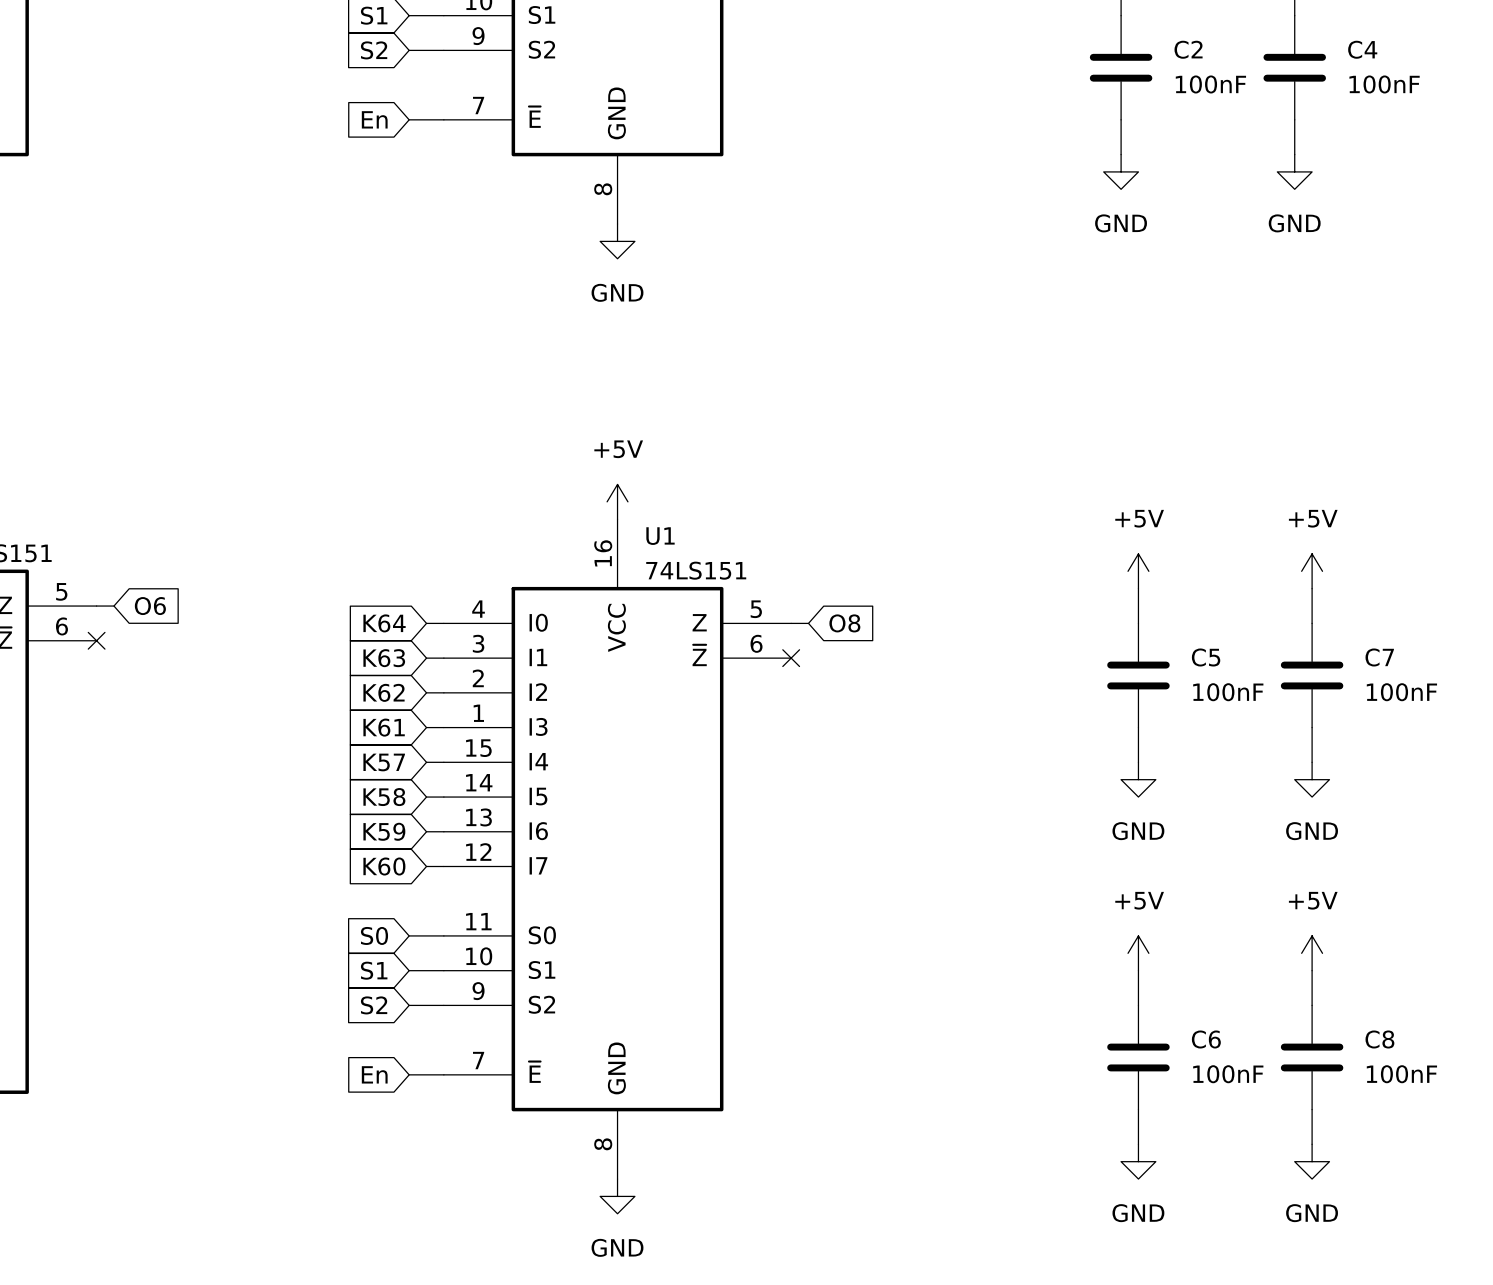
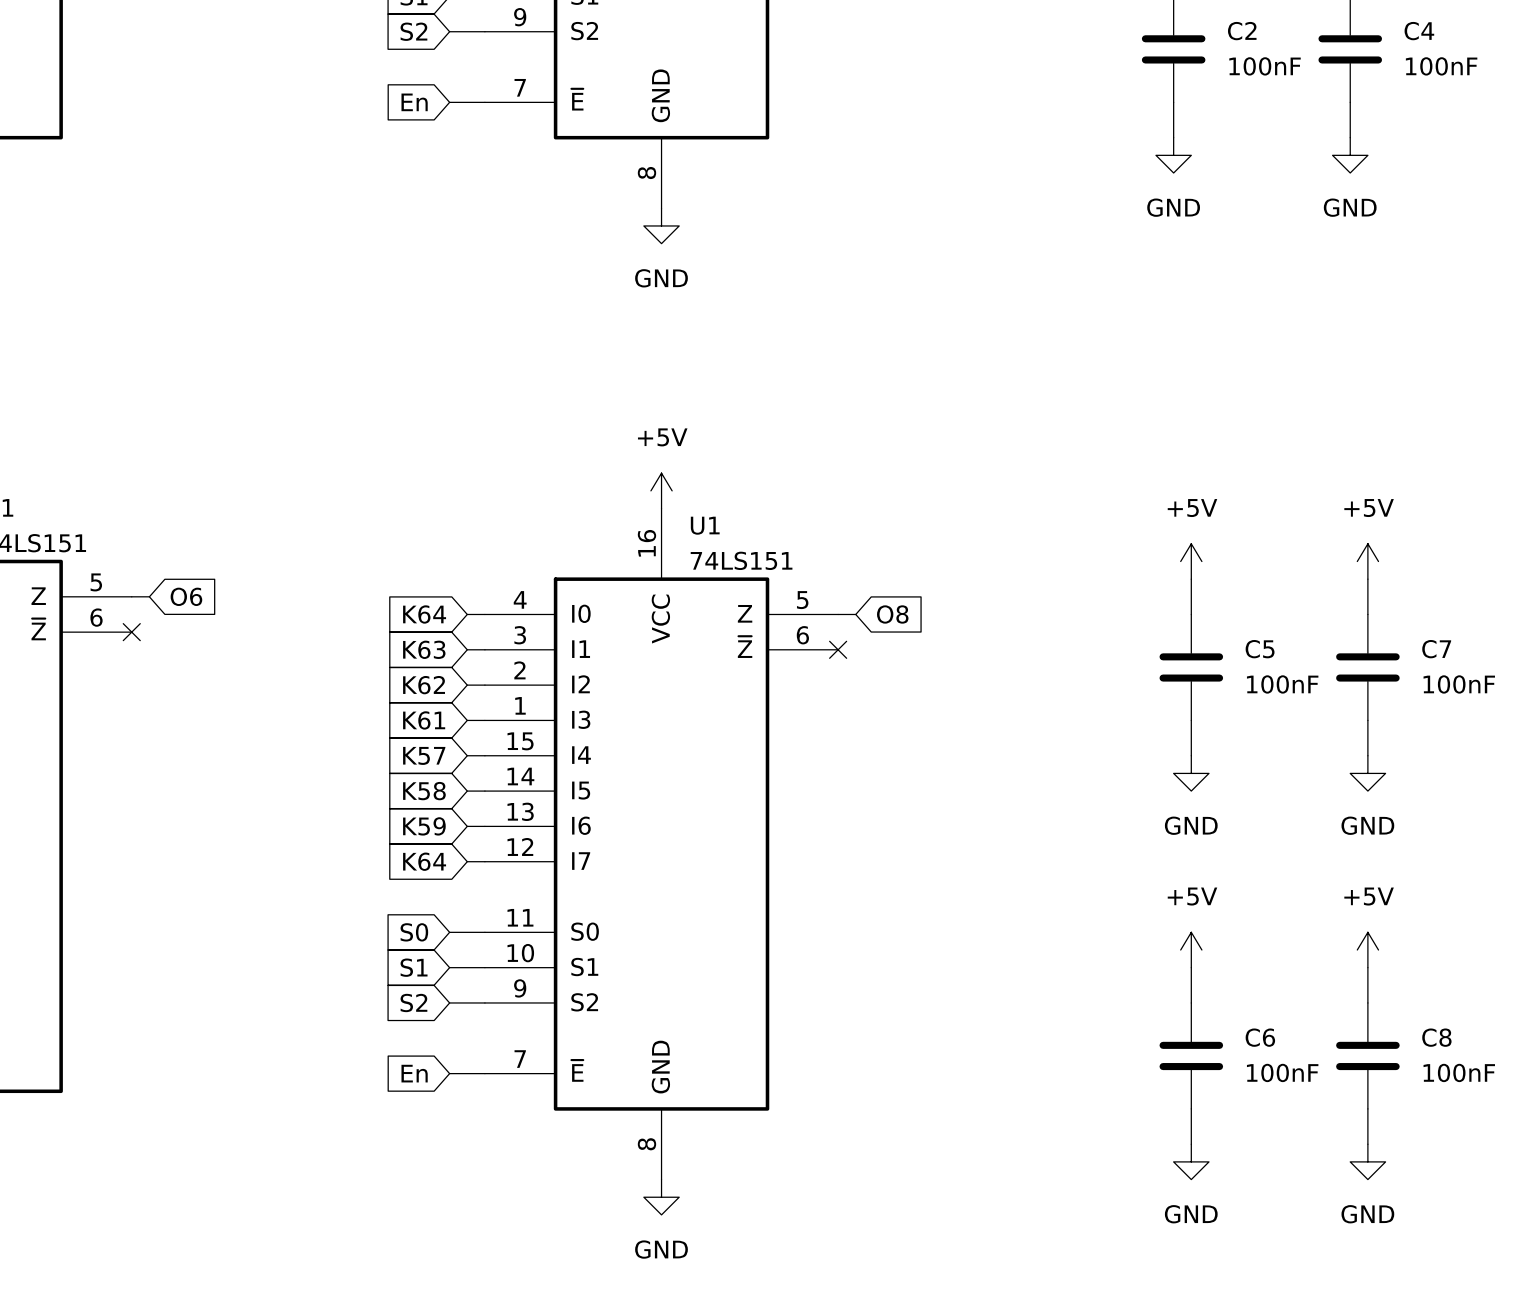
global label: K60 (384, 866) -> K64 (424, 861)

